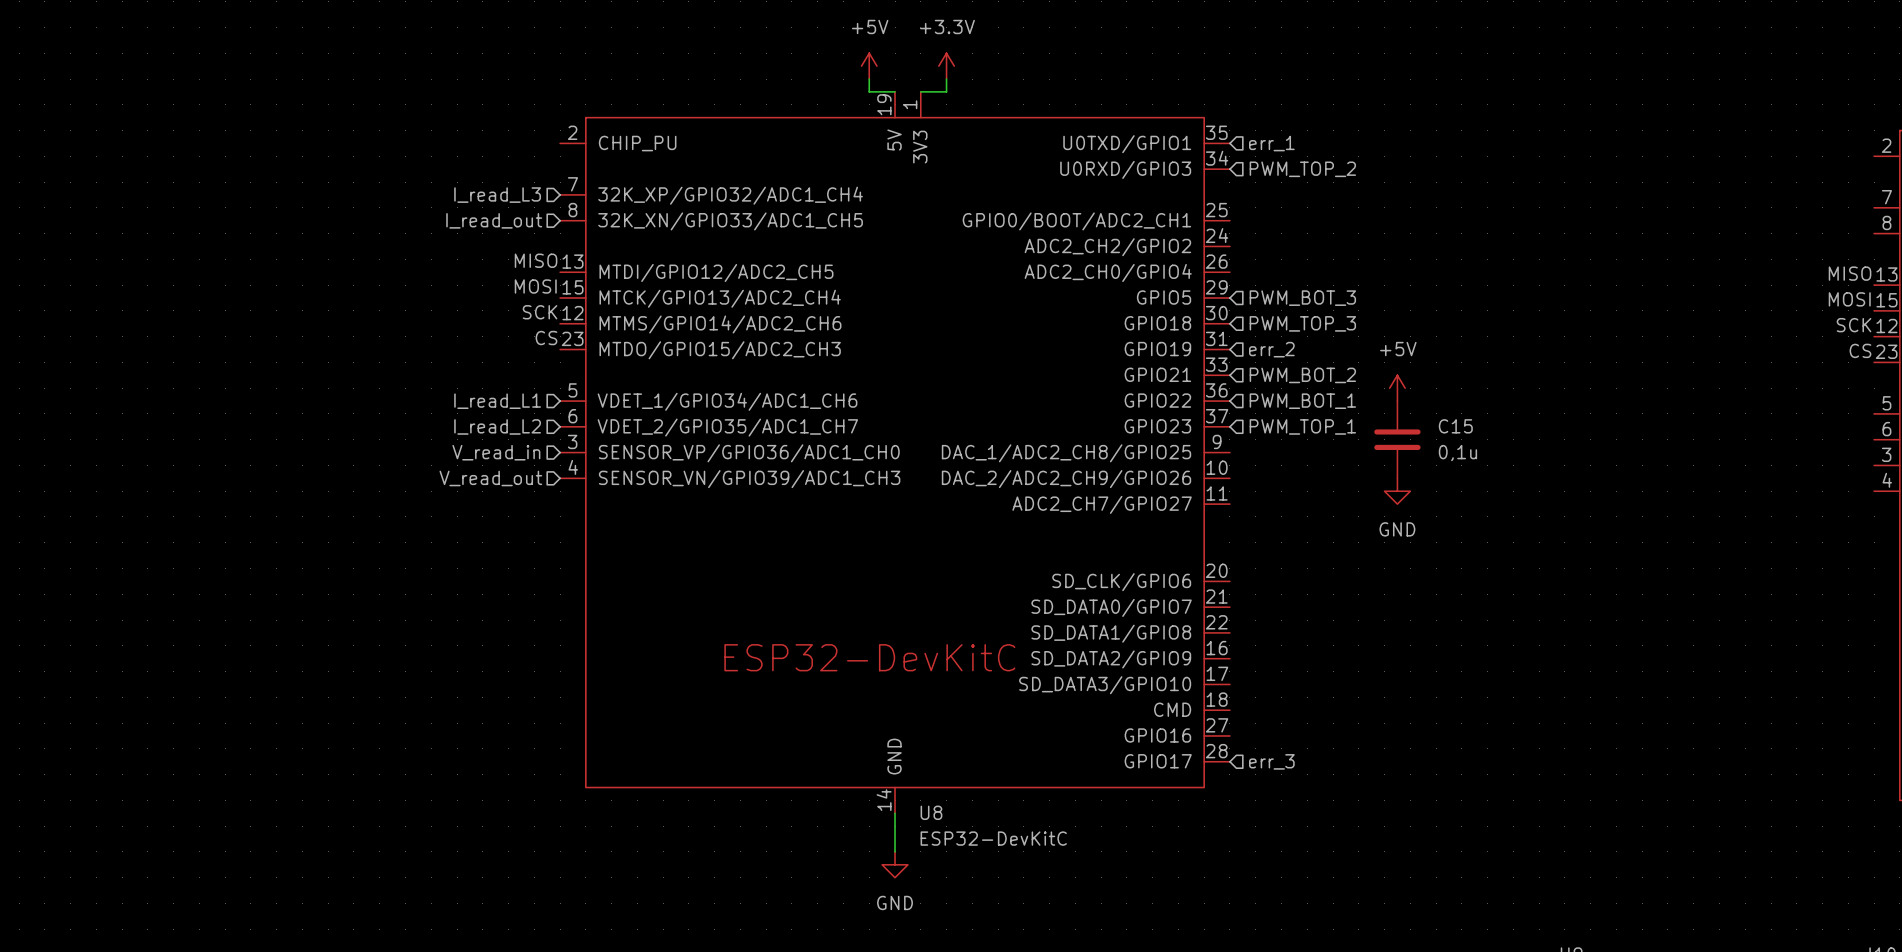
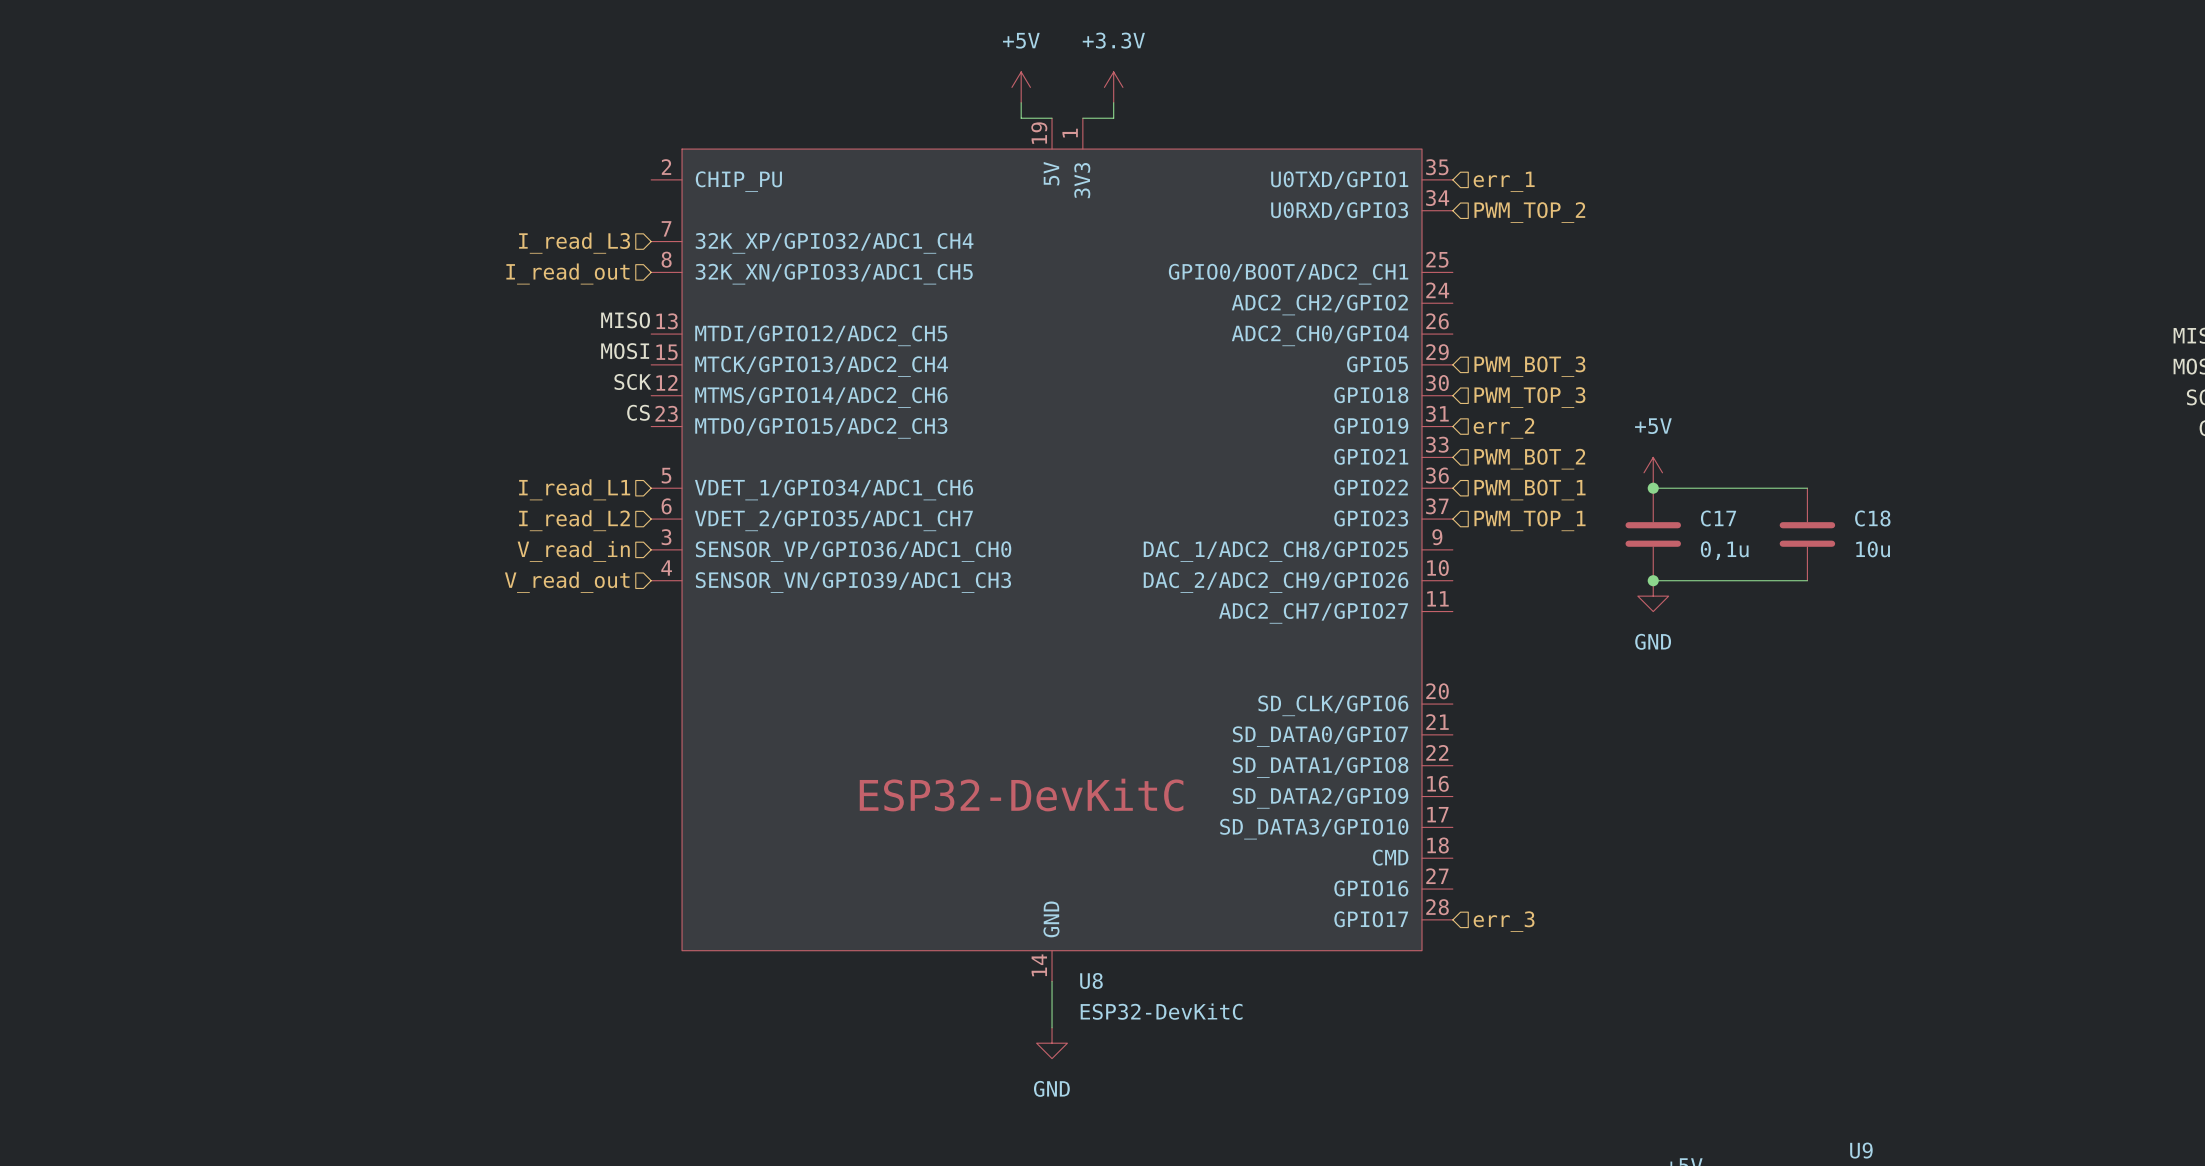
wire: none -> (1653, 488) (1807, 488)
junction: none -> (1653, 488)
C15 name: C15 (1455, 426) -> C17 (1718, 518)
C18: none -> 10u (1807, 534)
wire: none -> (1653, 580) (1807, 580)
junction: none -> (1653, 580)

